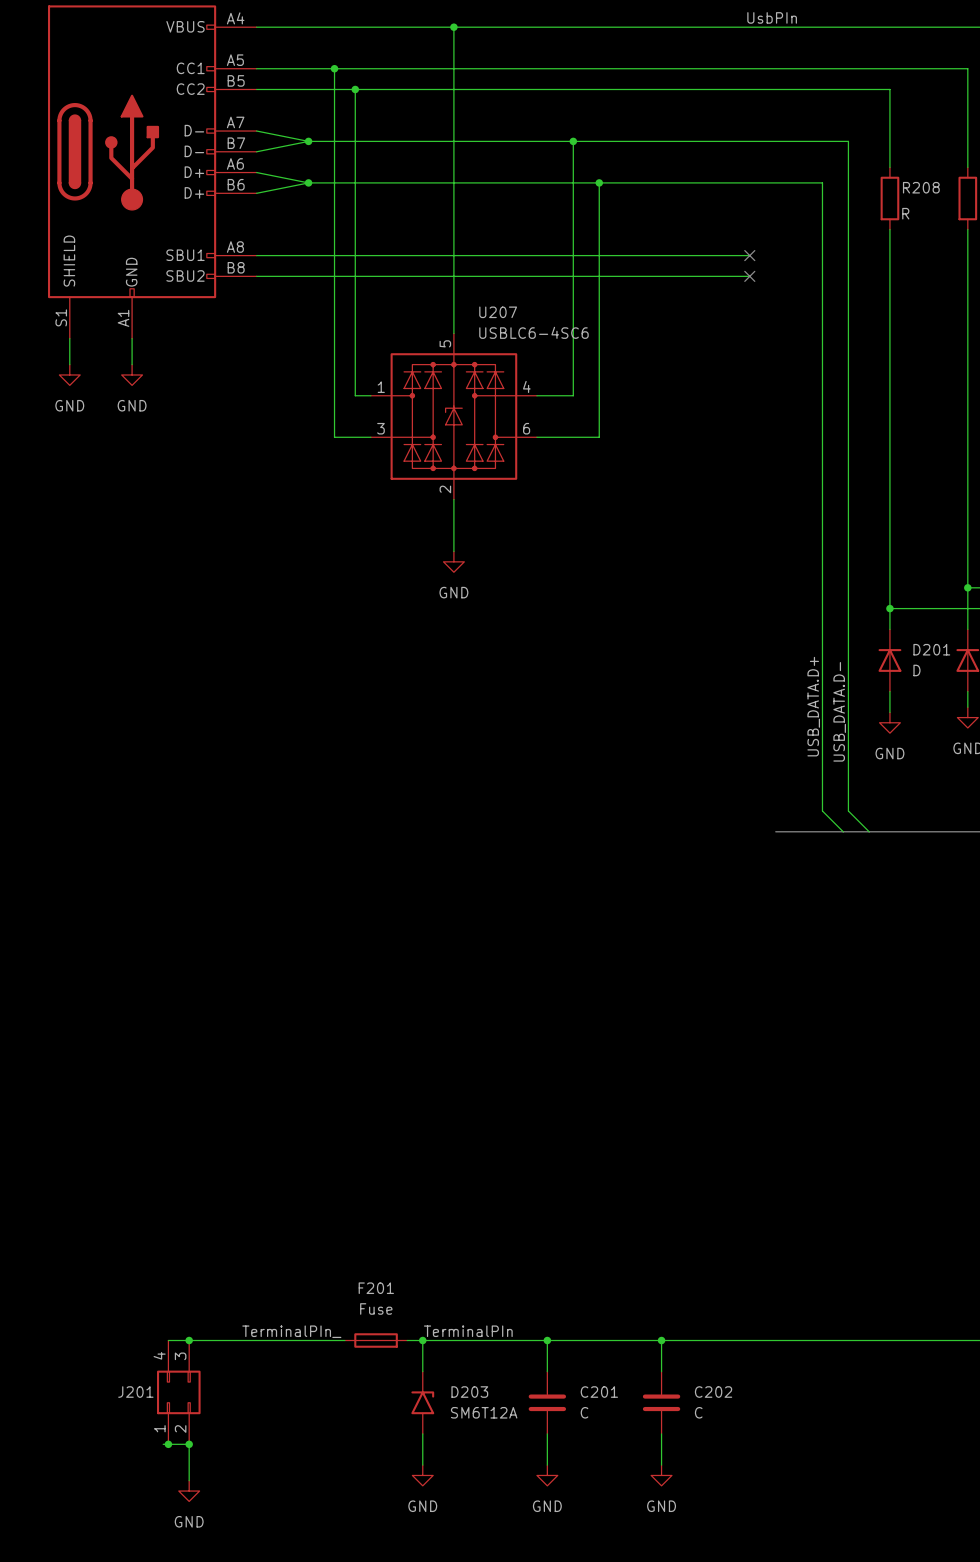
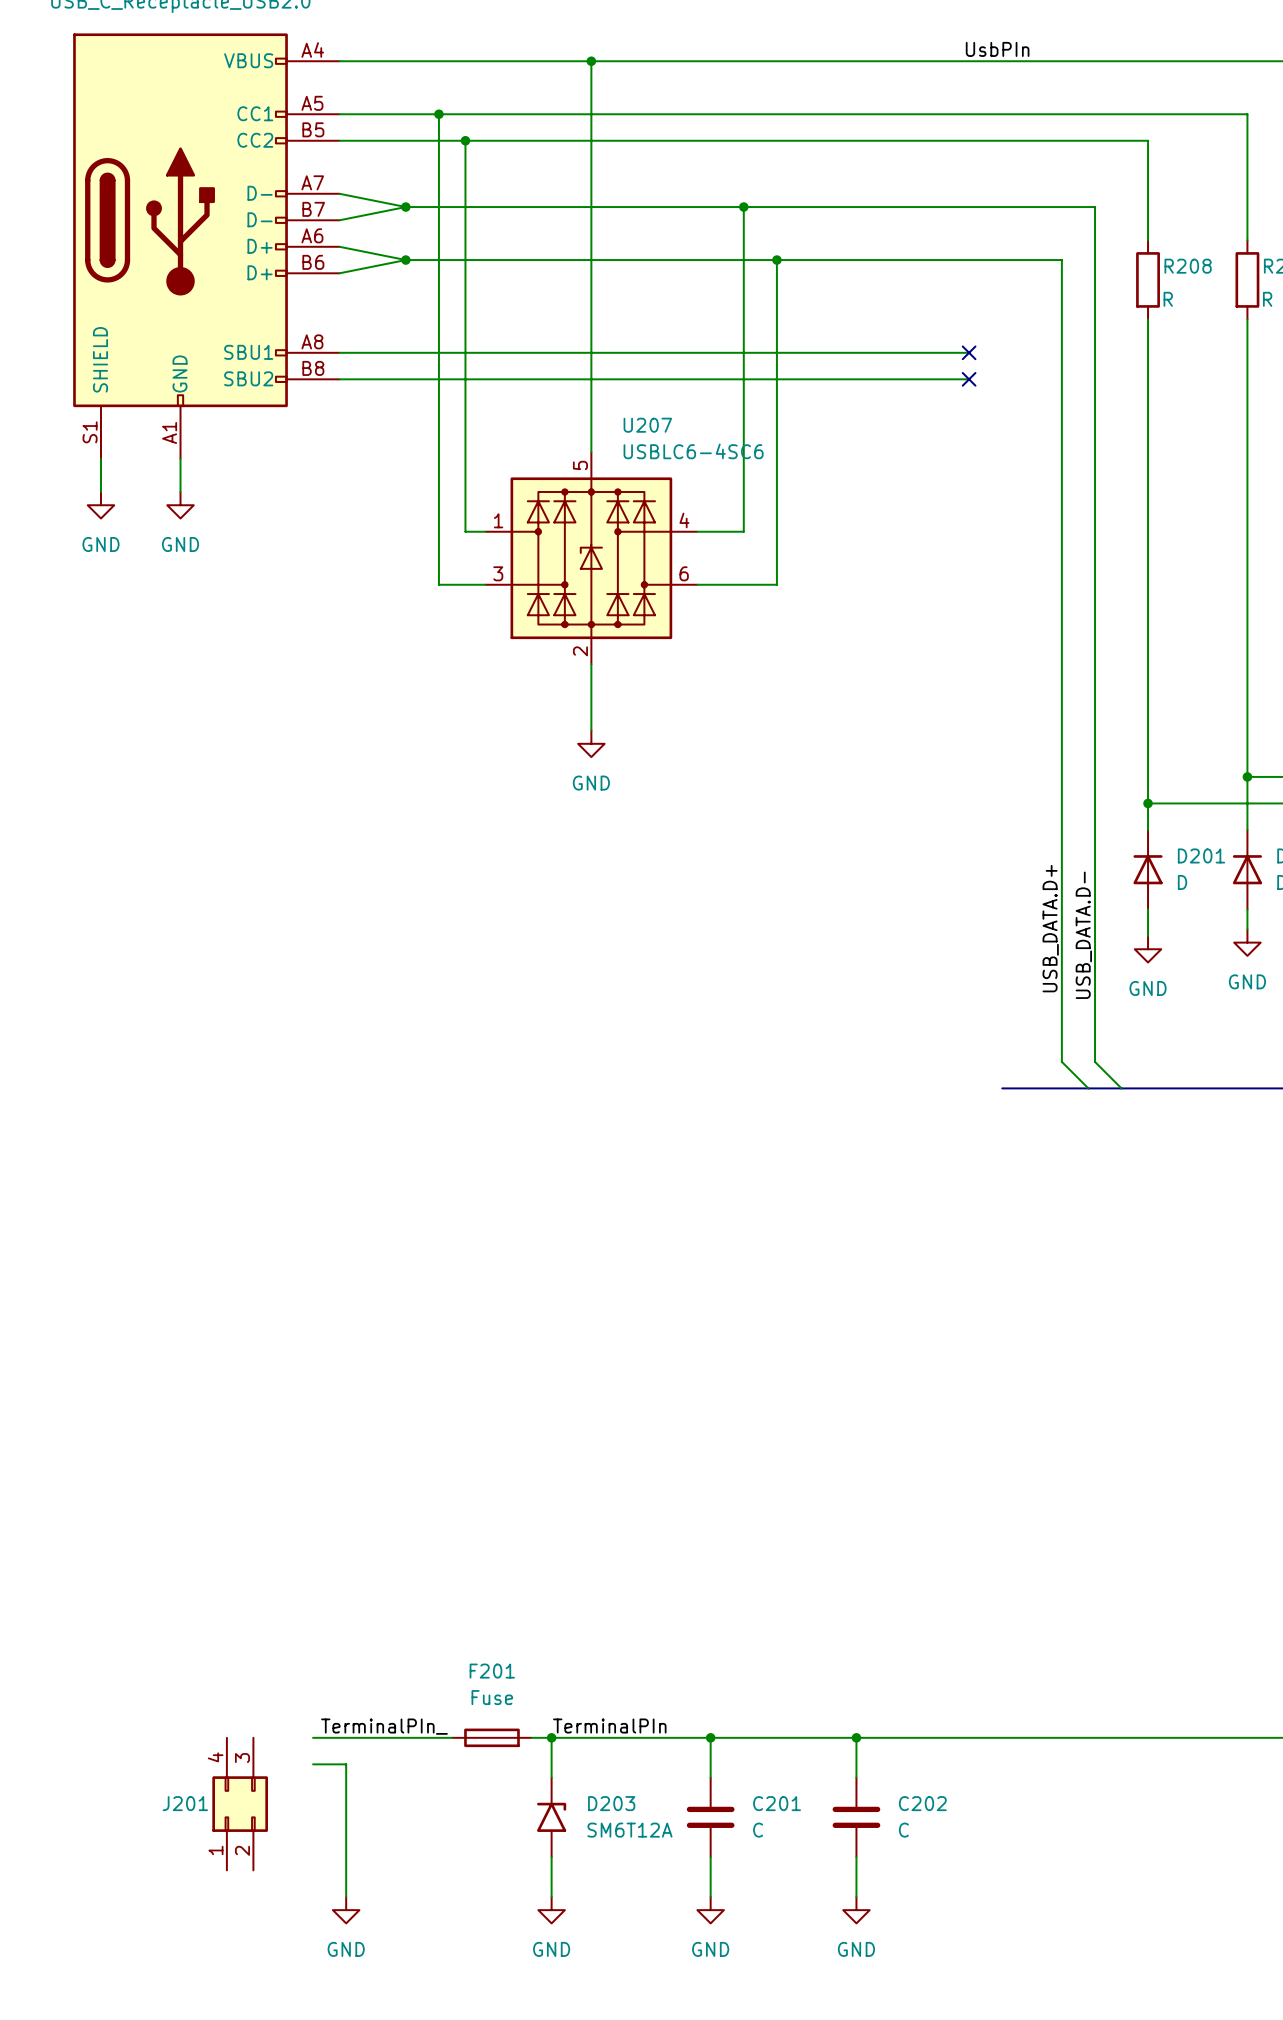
wire: (168, 1340) (235, 1340) -> none
junction: (189, 1340) -> none
wire: none -> (313, 1764) (346, 1764) (346, 1896)
wire: (163, 1444) (189, 1444) (189, 1480) -> none
junction: (168, 1444) -> none
junction: (189, 1444) -> none
power symbol position: GND (189, 1491) -> GND (346, 1910)

